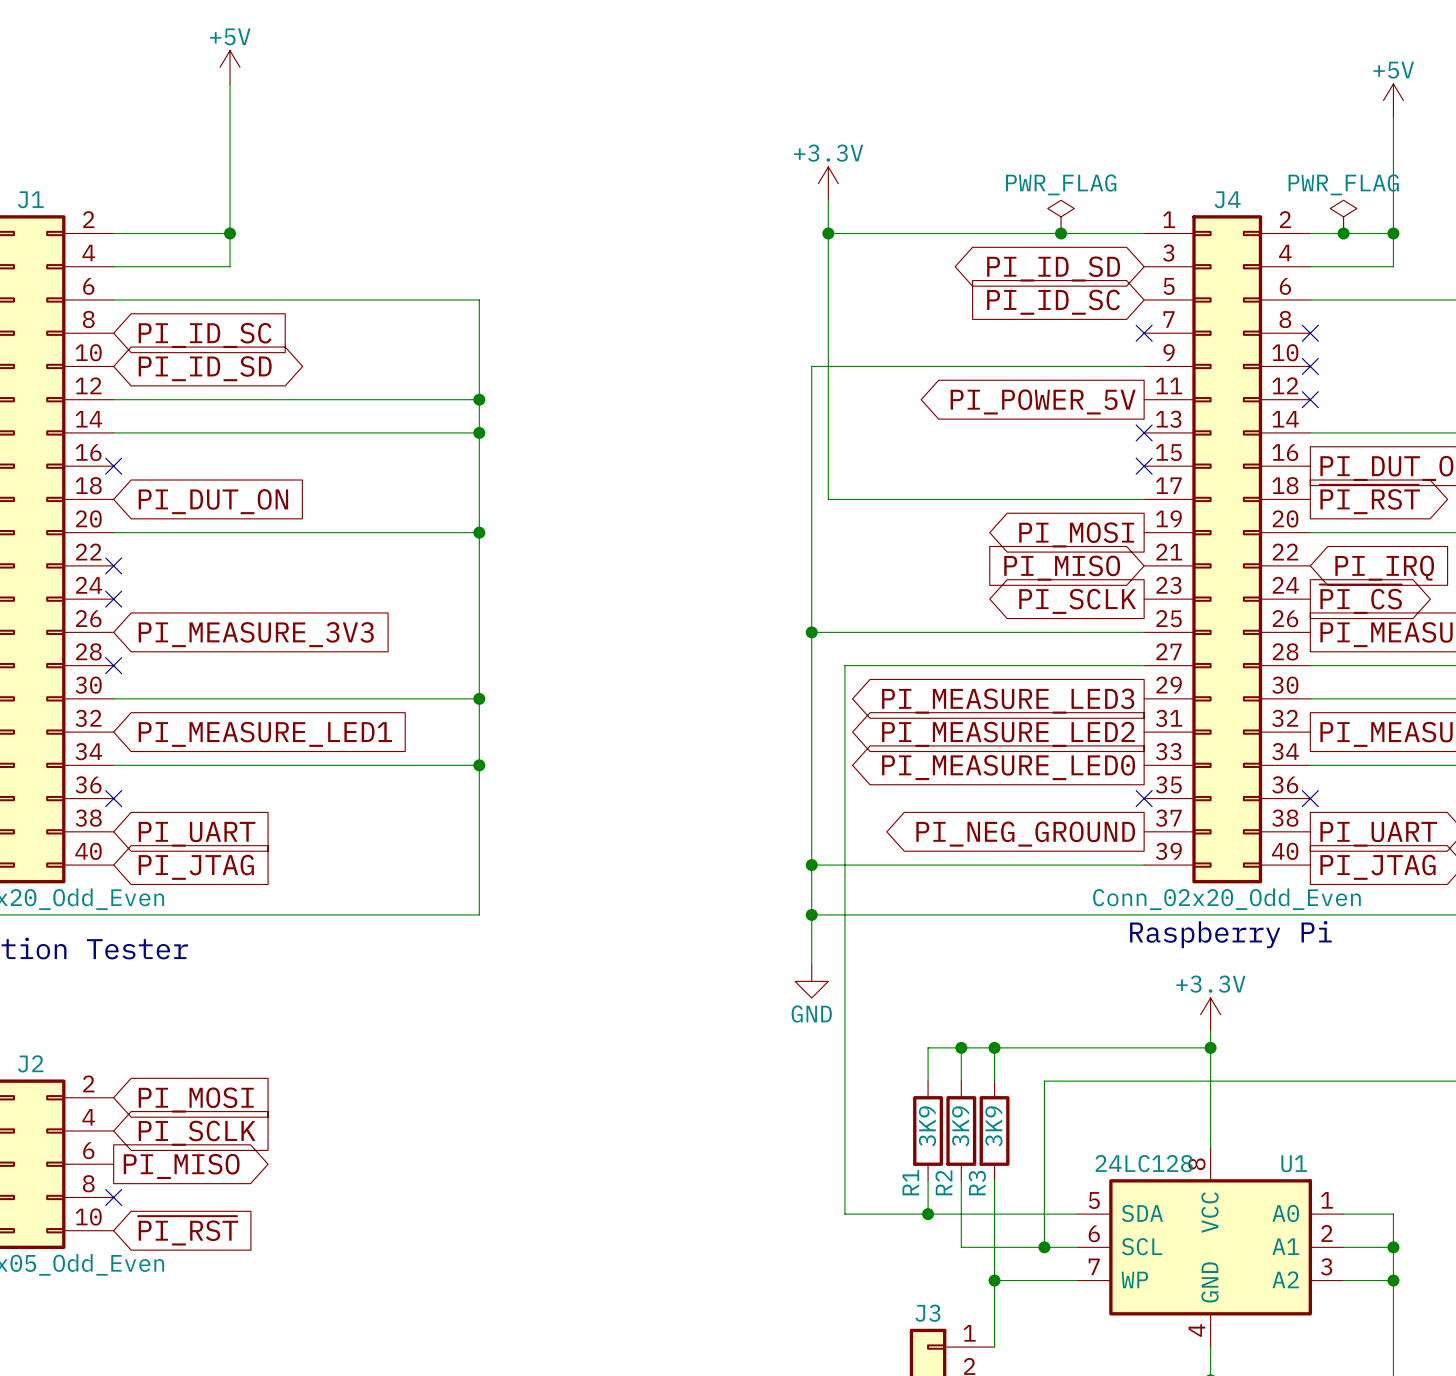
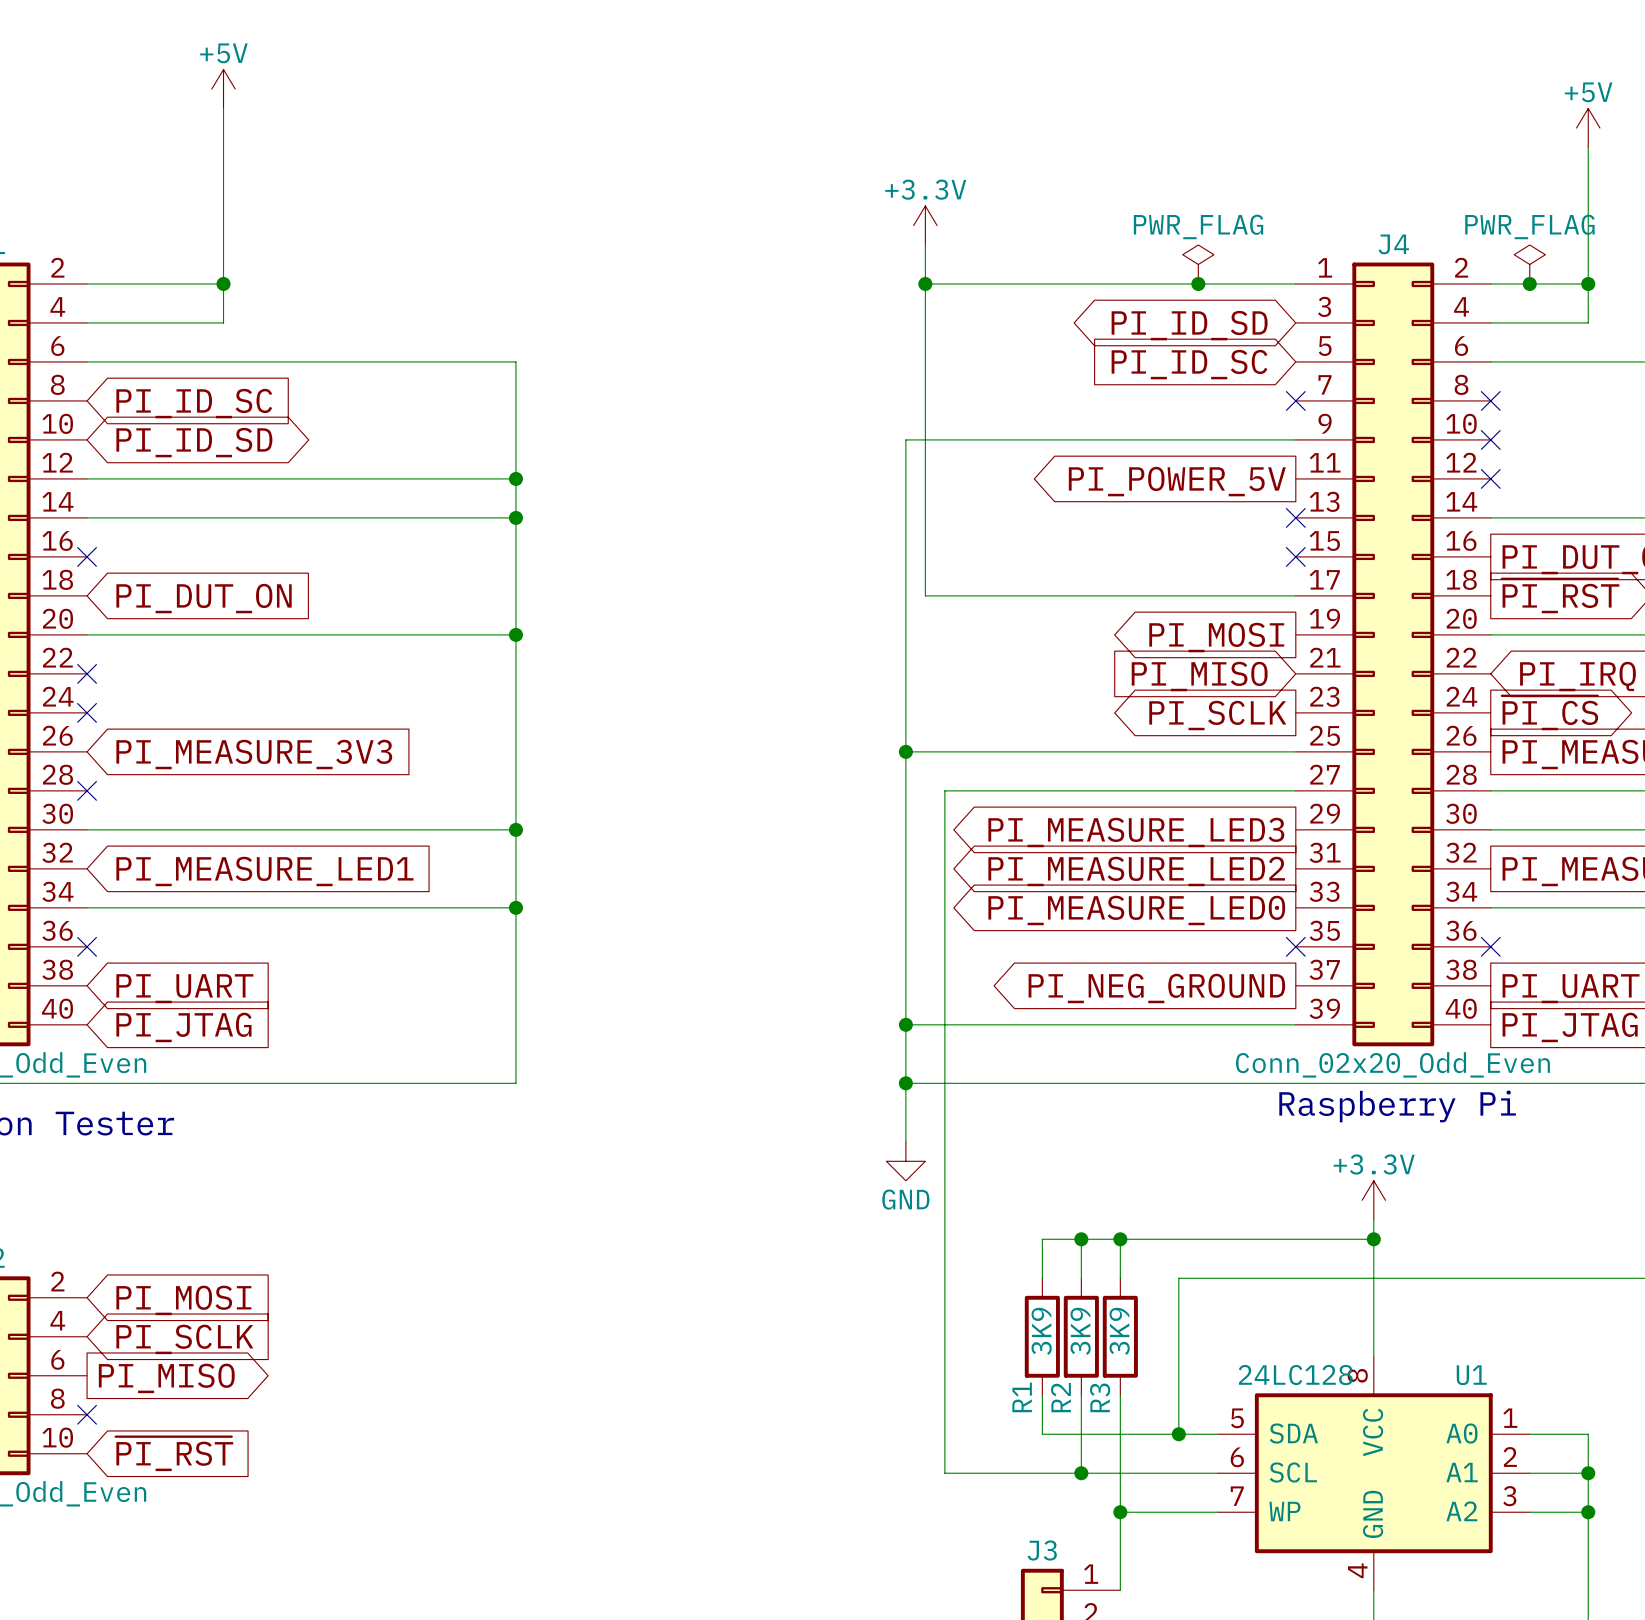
wire: (844, 1214) (928, 1214) -> (944, 1434) (944, 1473) (1081, 1473)
junction: (928, 1214) -> none
wire: (1044, 1214) (1044, 1247) -> none
junction: none -> (1081, 1473)
junction position: (1044, 1247) -> (1178, 1434)

